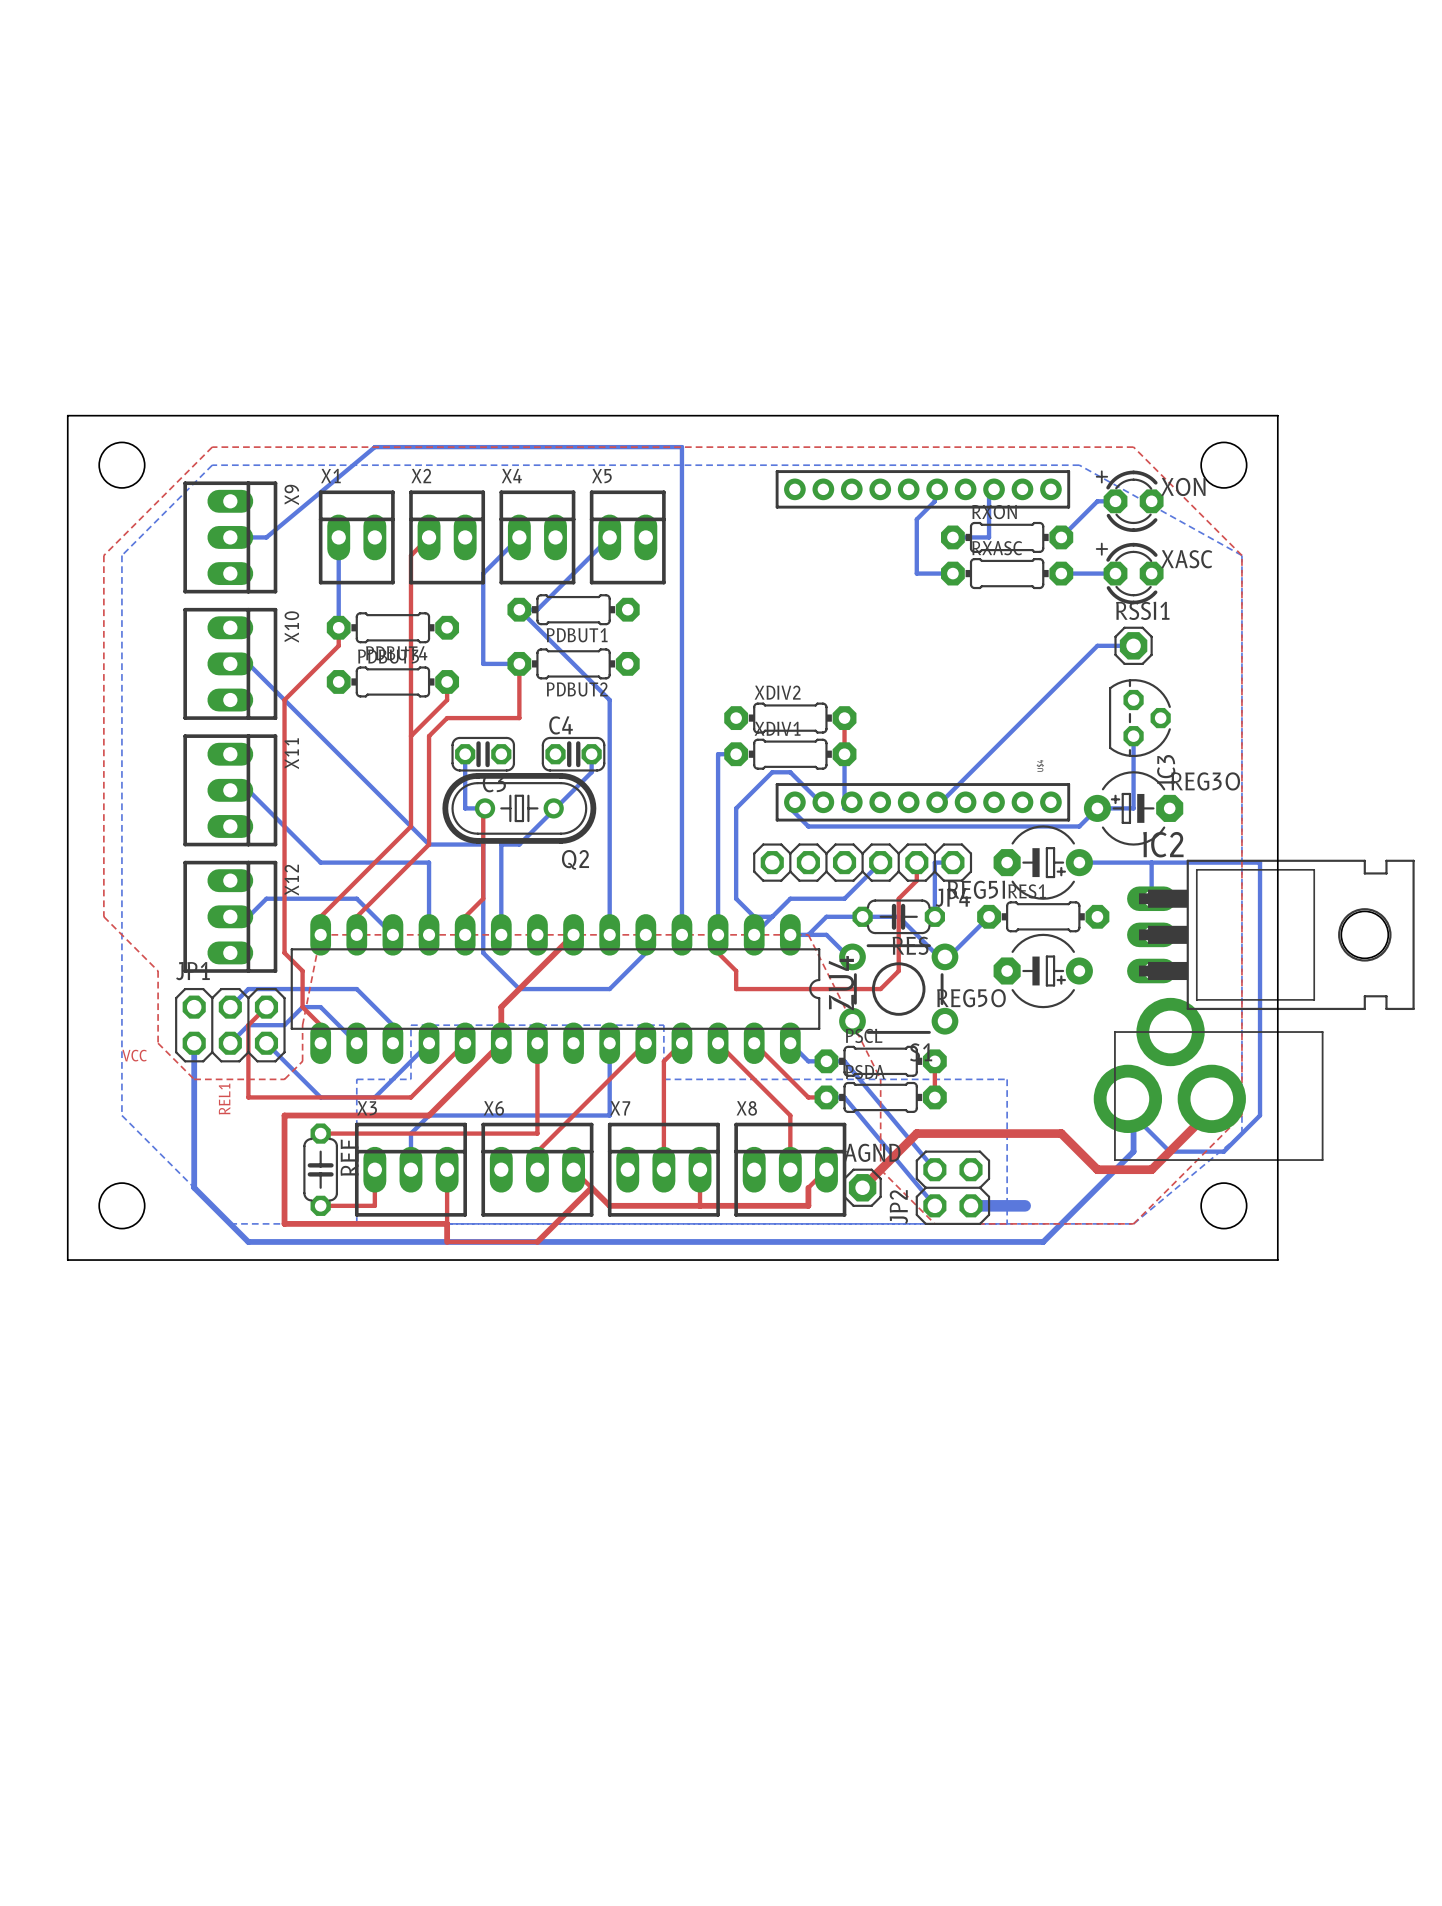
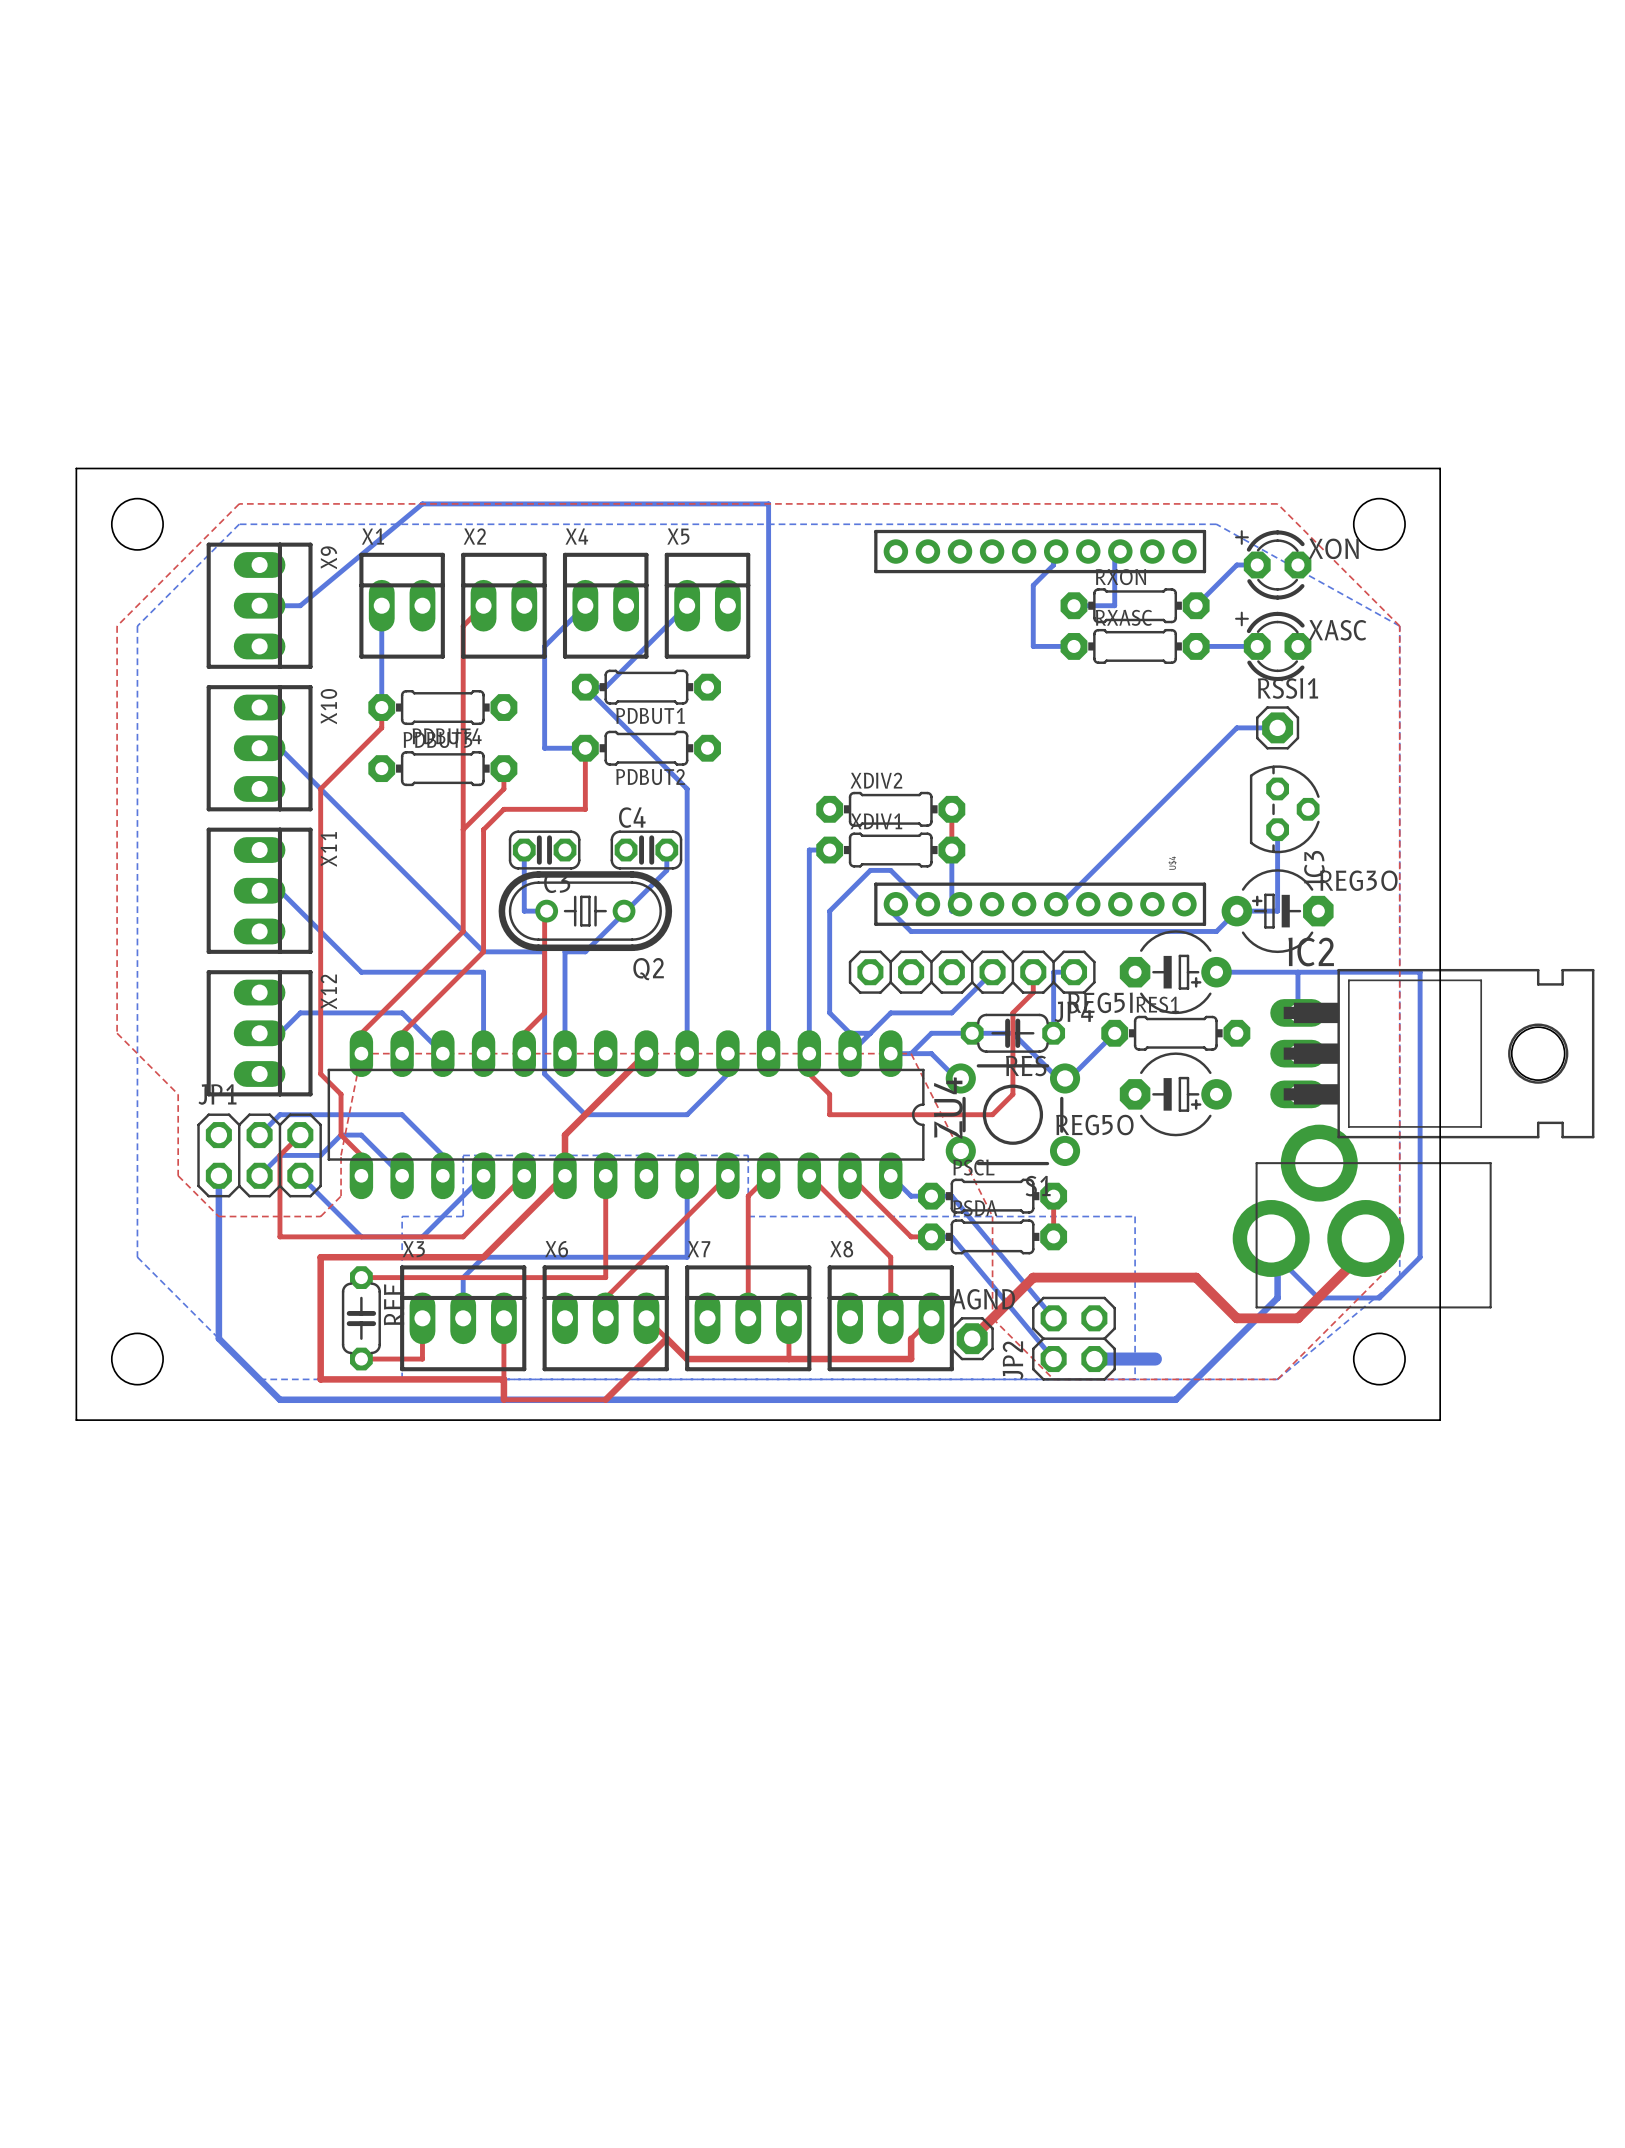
text: VCC (134, 1055) -> none
text: REL1 (224, 1099) -> none

